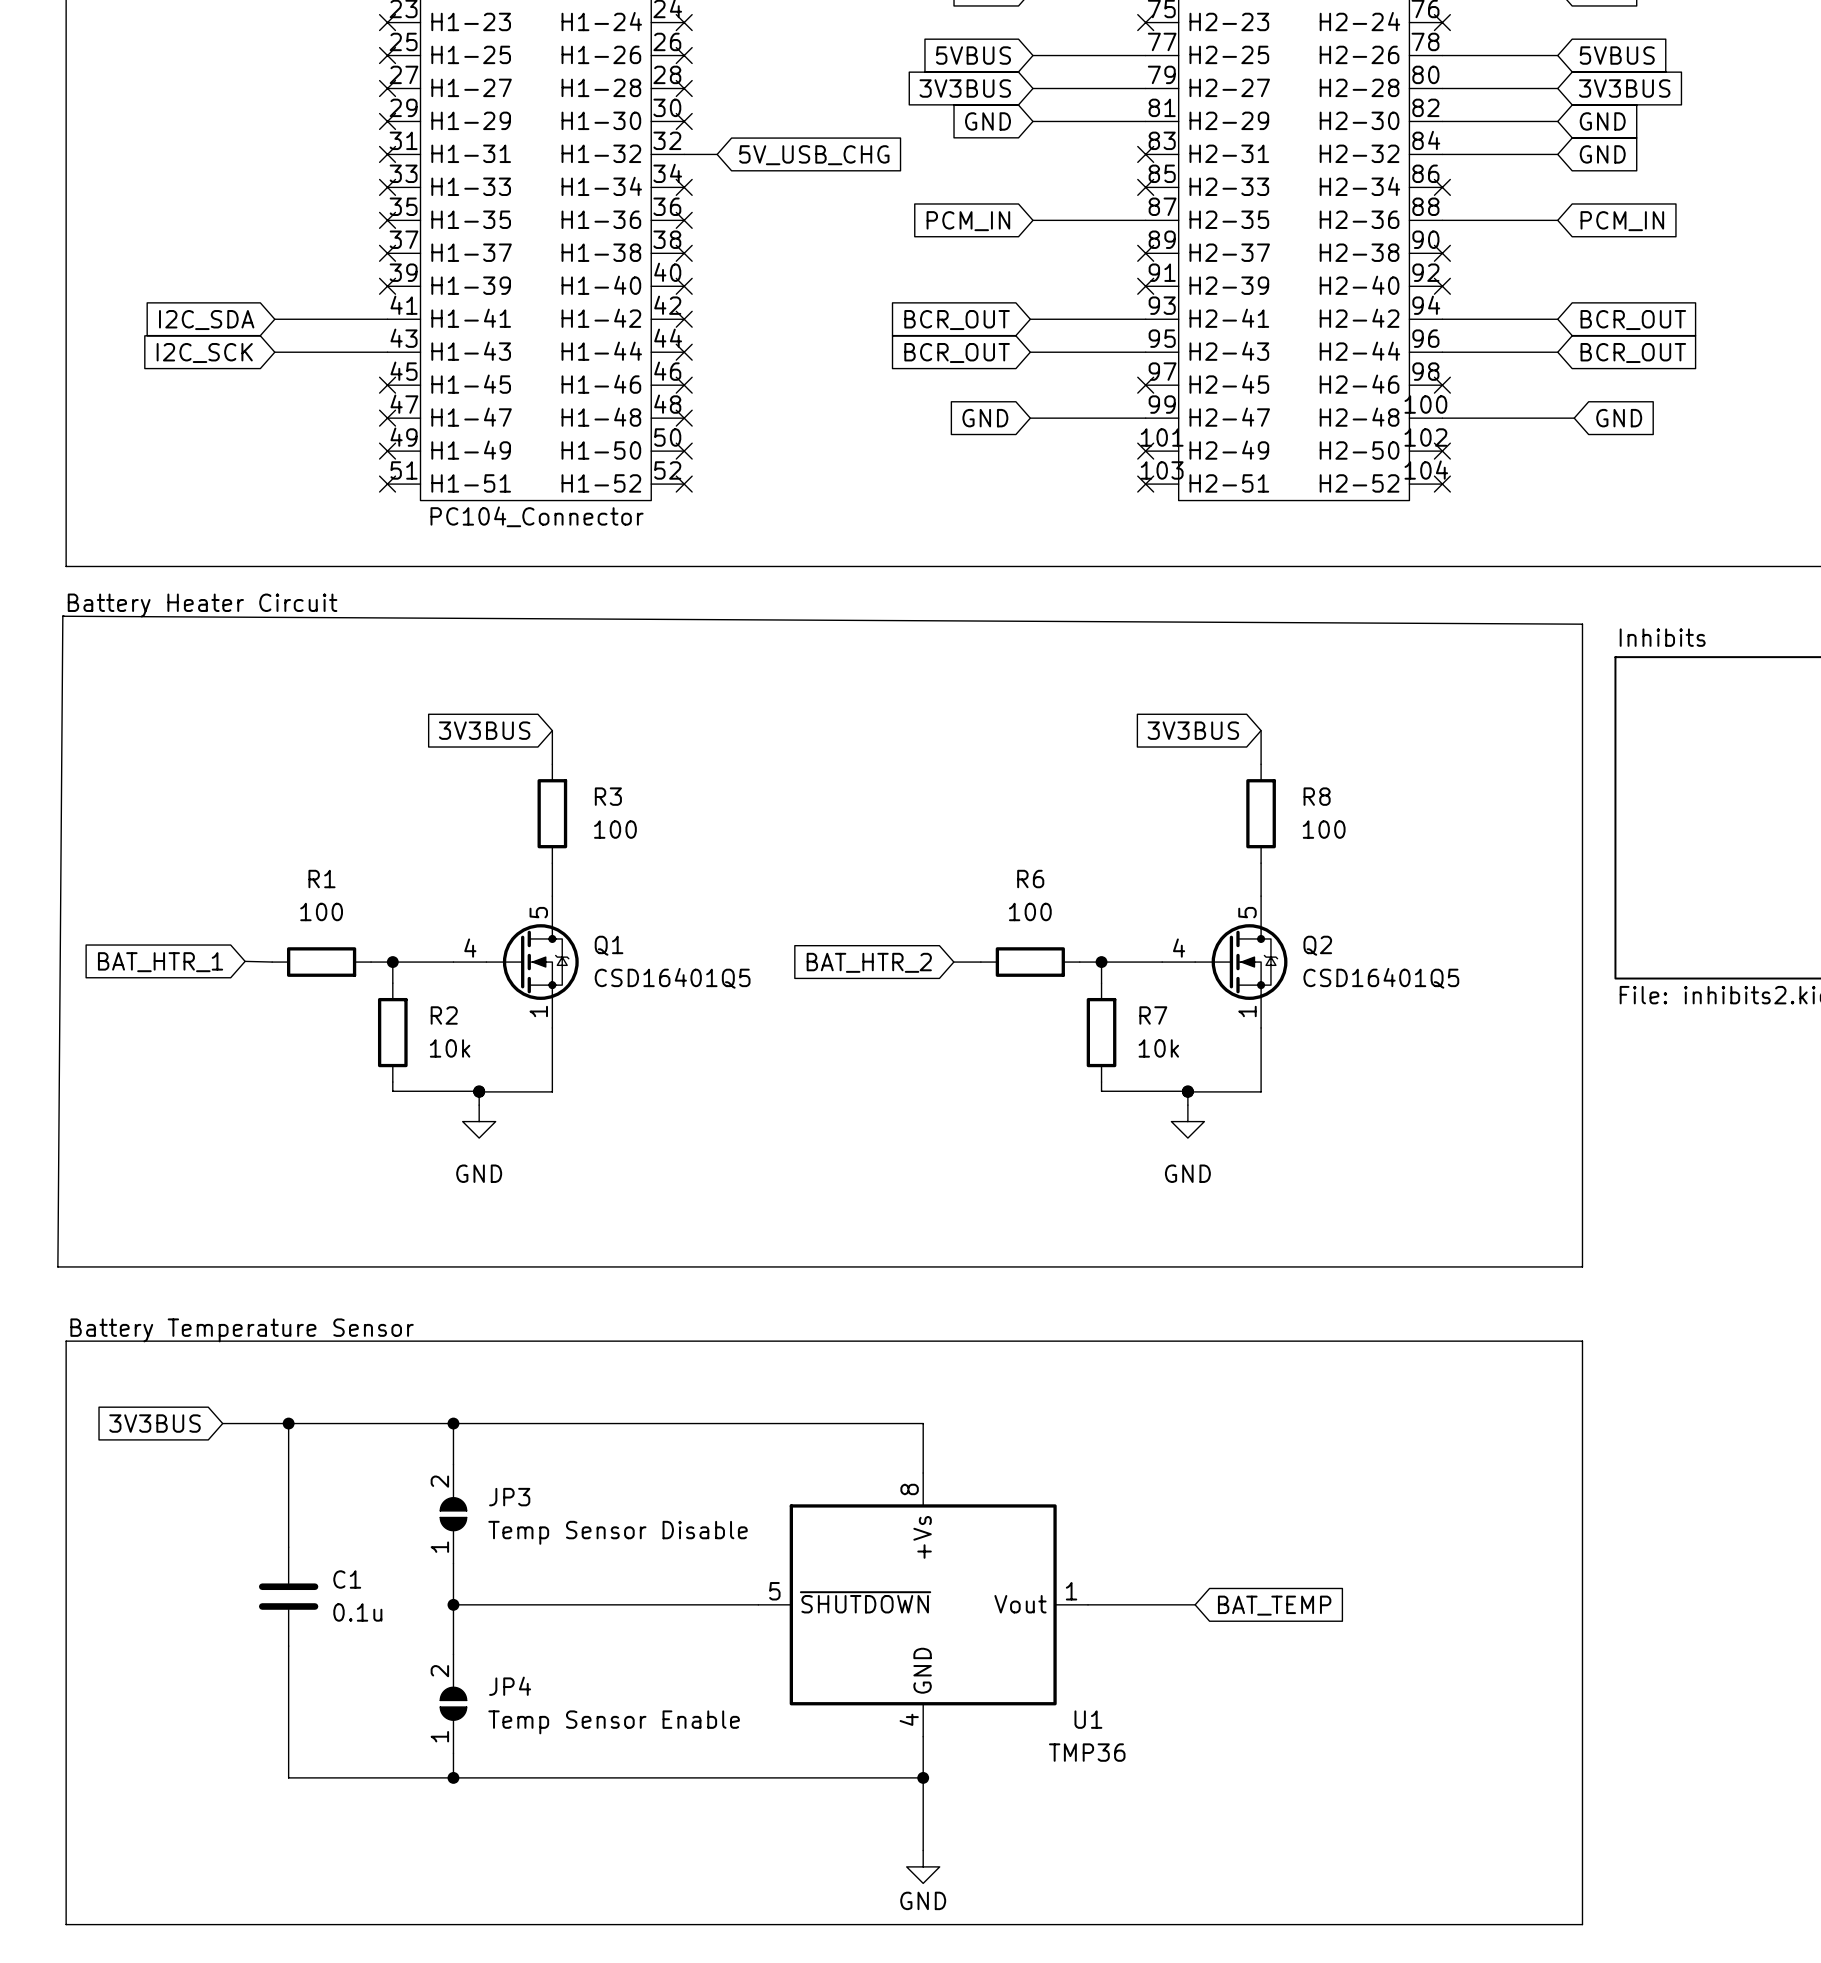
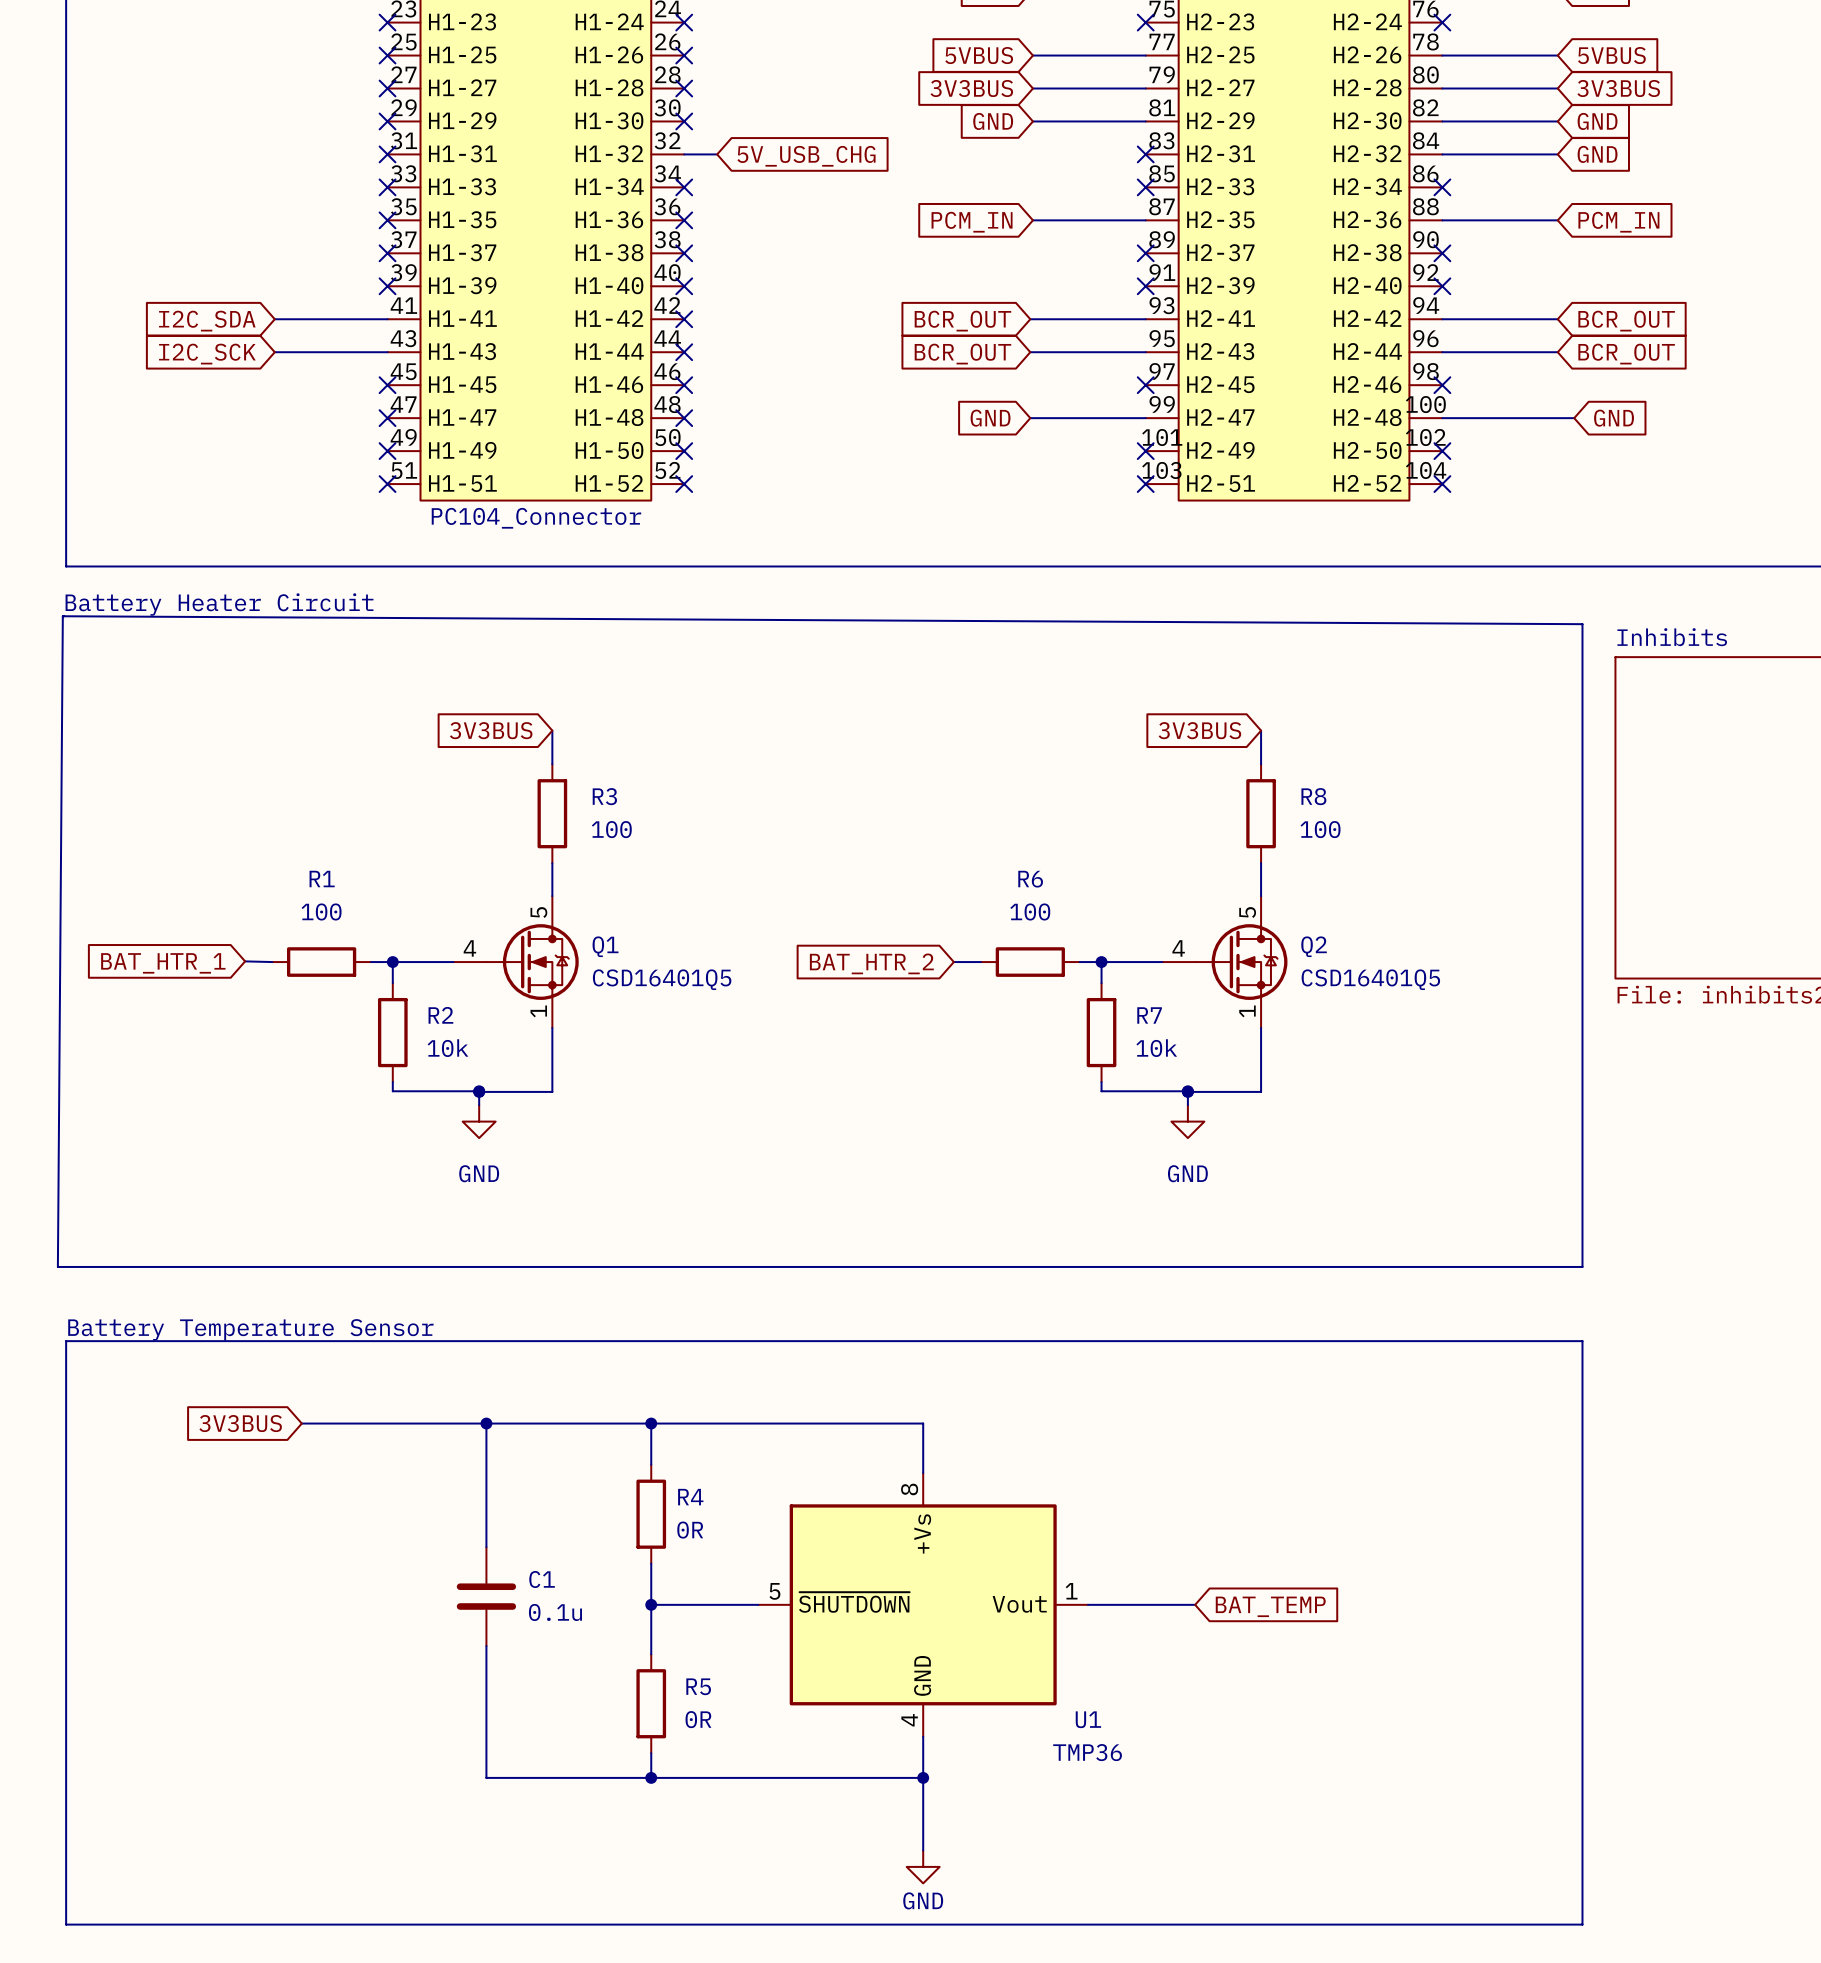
global label position: 3V3BUS (154, 1423) -> 3V3BUS (240, 1423)
wire: (222, 1423) (301, 1423) -> none
wire: (288, 1423) (288, 1547) -> (486, 1423) (486, 1547)
junction: (288, 1423) -> none
wire: (453, 1423) (453, 1464) -> (651, 1423) (651, 1464)
junction position: (453, 1423) -> (486, 1423)
junction: none -> (651, 1423)
JP3: Temp Sensor Disable (453, 1514) -> none
R4: none -> 0R (651, 1514)
wire: (453, 1563) (453, 1654) -> (651, 1563) (651, 1654)
C1 position: (288, 1596) -> (486, 1596)
wire: (453, 1604) (651, 1604) -> none
junction: (453, 1604) -> none
junction: none -> (651, 1604)
wire: (288, 1646) (288, 1777) (486, 1777) -> (486, 1646) (486, 1777)
JP4: Temp Sensor Enable (453, 1703) -> none
R5: none -> 0R (651, 1703)
wire: (453, 1753) (453, 1777) -> (651, 1753) (651, 1777)
junction: (453, 1777) -> none
junction: none -> (651, 1777)

